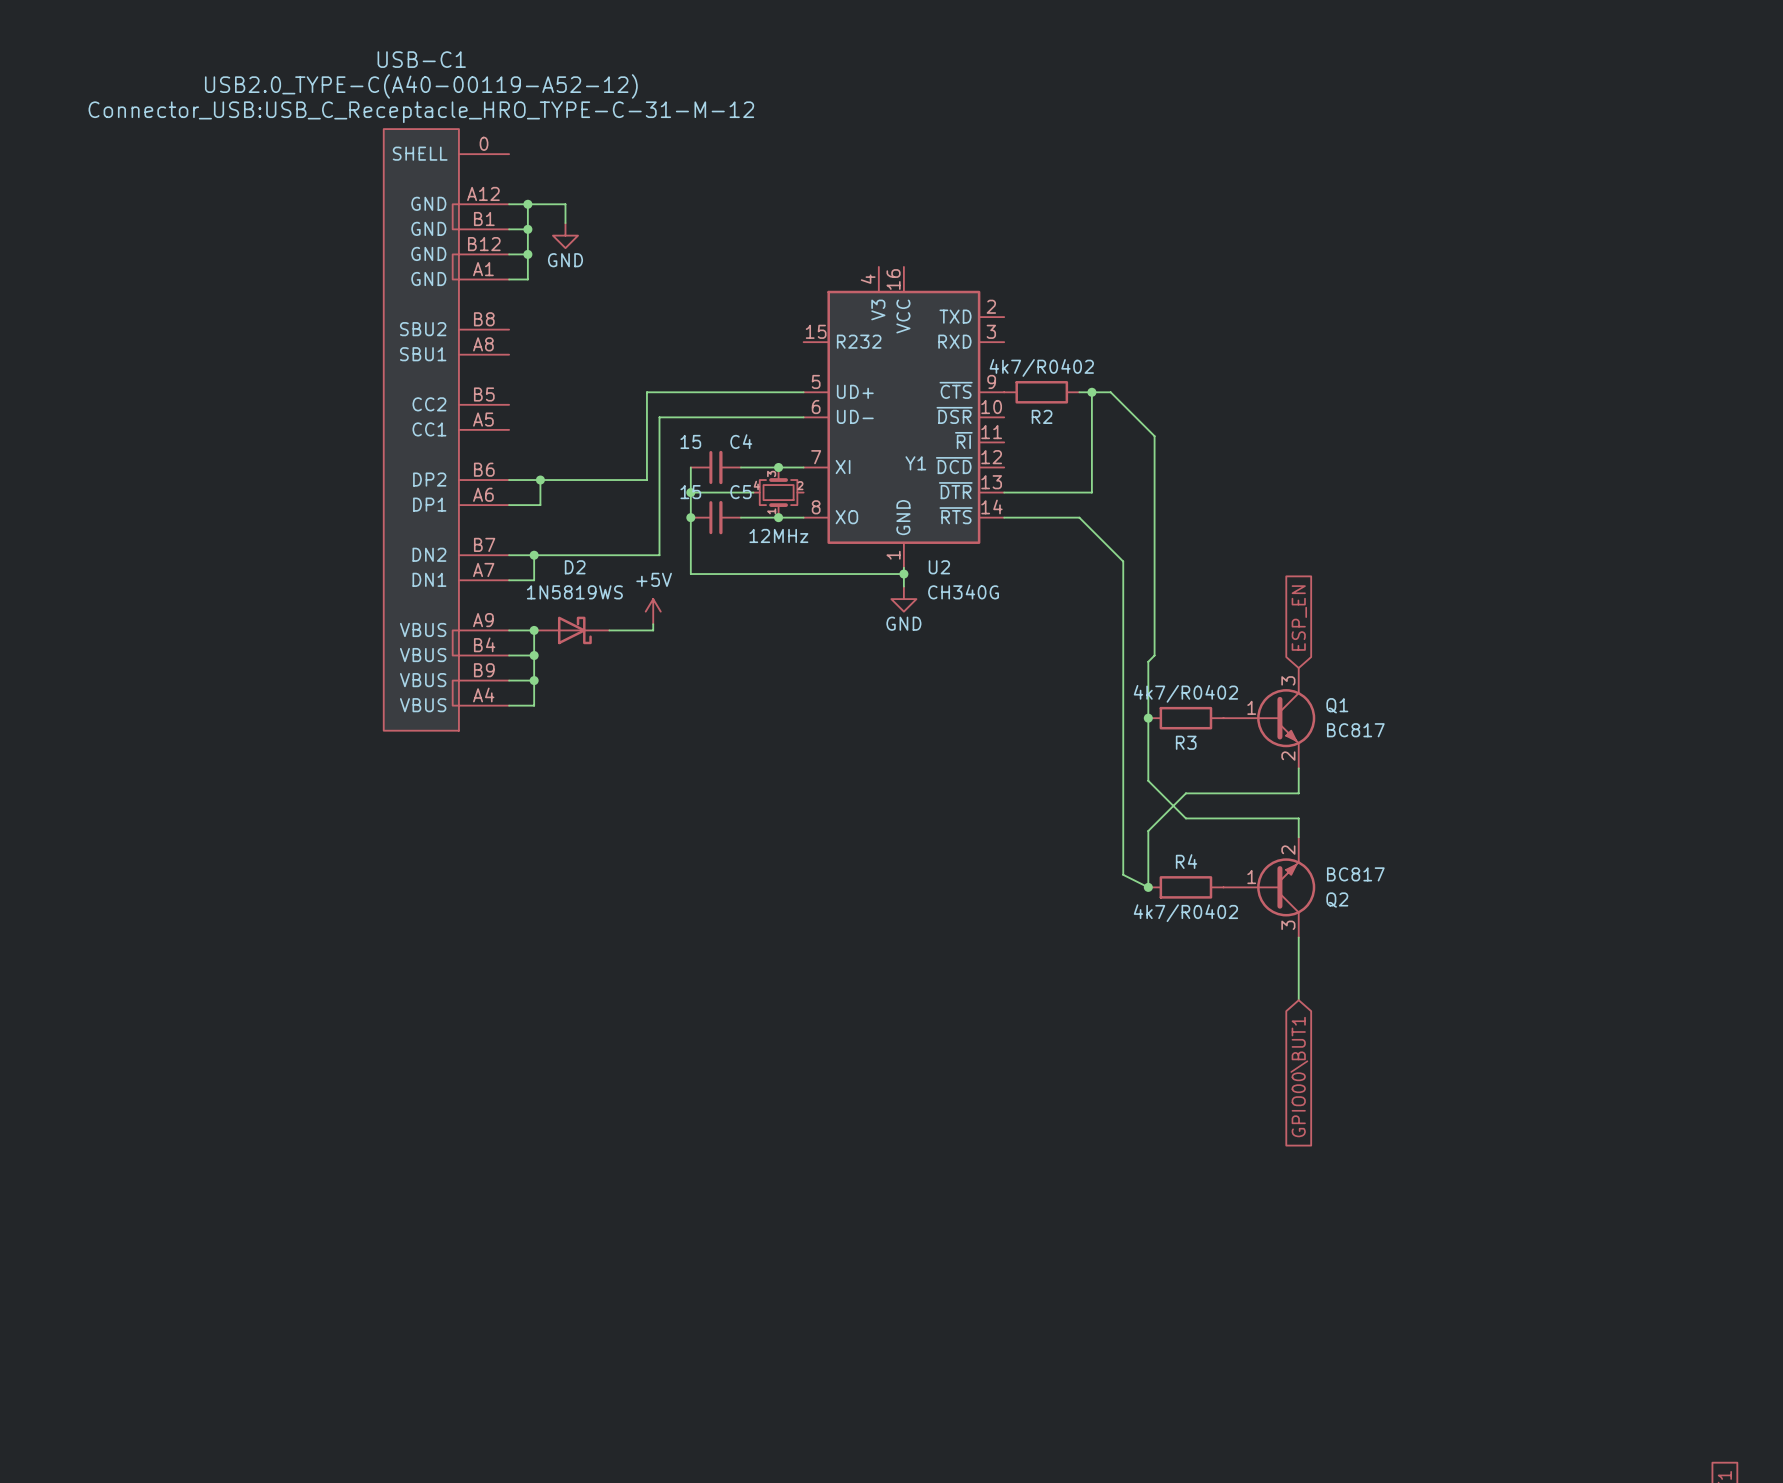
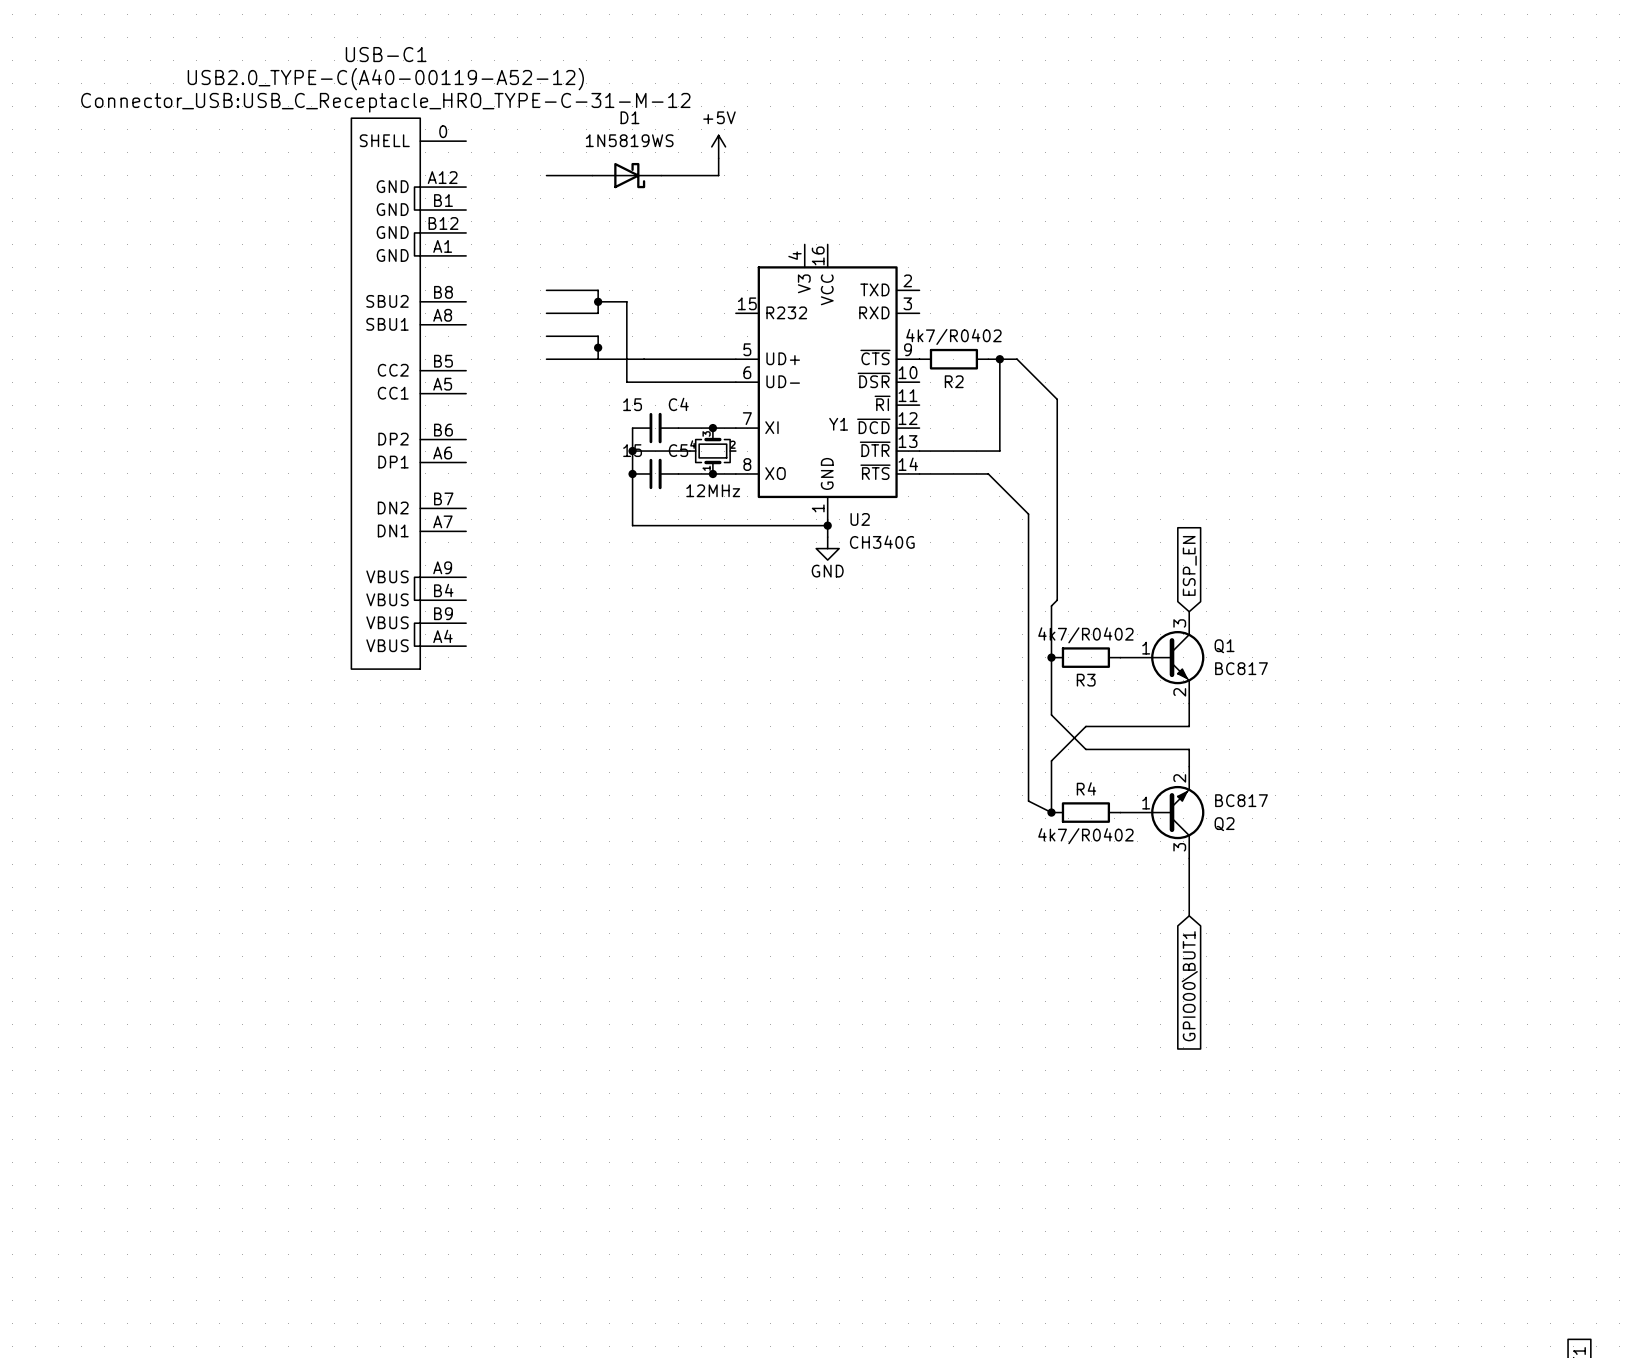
power symbol: none -> +5V (718, 146)
wire: none -> (718, 158) (718, 175) (661, 175)
wire: none -> (546, 175) (592, 175)
D1: none -> 1N5819WS (626, 175)
wire: (509, 204) (565, 204) (565, 223) -> none
wire: (527, 204) (527, 279) (509, 279) -> none
junction: (527, 204) -> none
wire: (509, 229) (527, 229) -> none
junction: (527, 229) -> none
power symbol: GND (565, 235) -> none
wire: (509, 254) (527, 254) -> none
junction: (527, 254) -> none
wire: none -> (546, 290) (598, 290) (598, 313) (546, 313)
junction: none -> (598, 301)
wire: none -> (546, 336) (598, 336) (598, 359)
junction: none -> (598, 347)
wire: (646, 392) (646, 480) (509, 480) -> (592, 359) (546, 359)
wire: (684, 417) (659, 417) (659, 555) (509, 555) -> (626, 382) (626, 301) (598, 301)
wire: (540, 480) (540, 505) (509, 505) -> none
junction: (540, 480) -> none
wire: (534, 555) (534, 580) (509, 580) -> none
junction: (534, 555) -> none
power symbol: +5V (653, 611) -> none
wire: (653, 624) (653, 630) (609, 630) -> none
wire: (509, 630) (534, 630) (534, 705) (509, 705) -> none
junction: (534, 630) -> none
D2: 1N5819WS (571, 630) -> none
wire: (509, 655) (534, 655) -> none
junction: (534, 655) -> none
wire: (509, 680) (534, 680) -> none
junction: (534, 680) -> none

